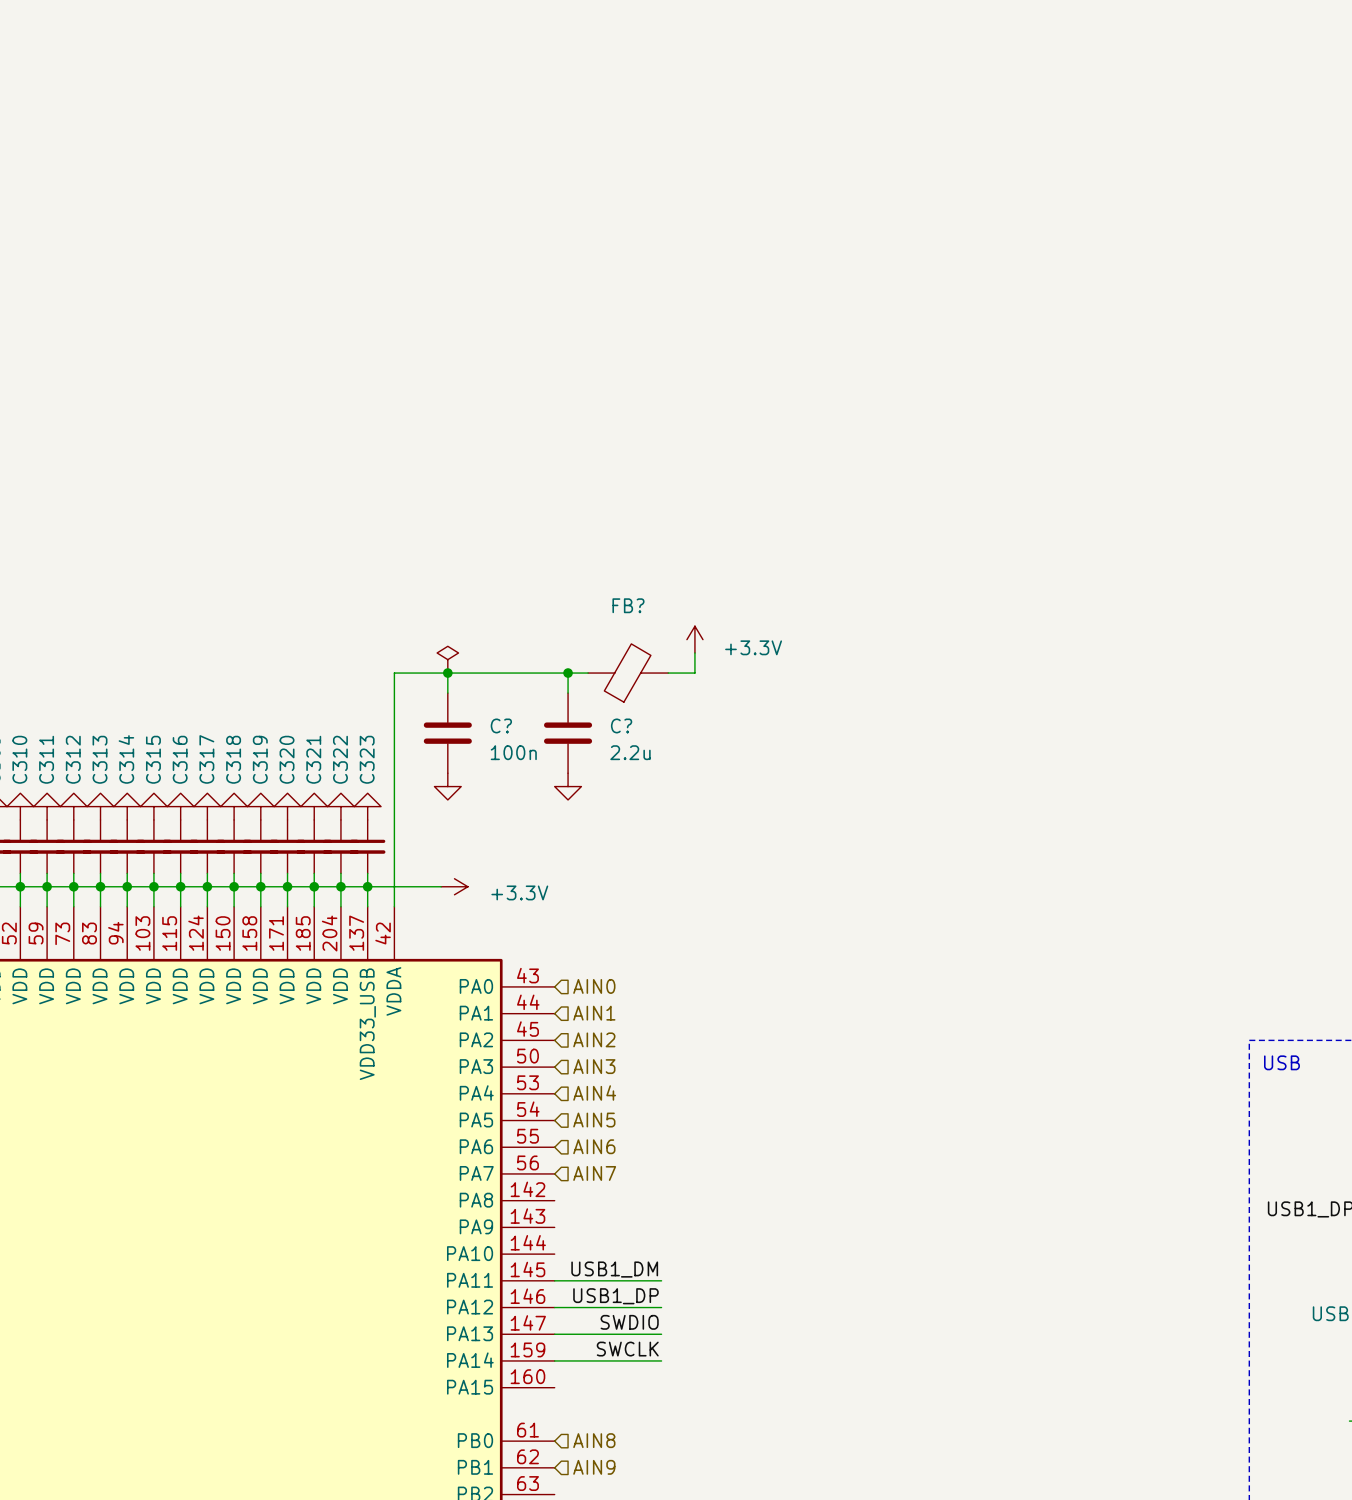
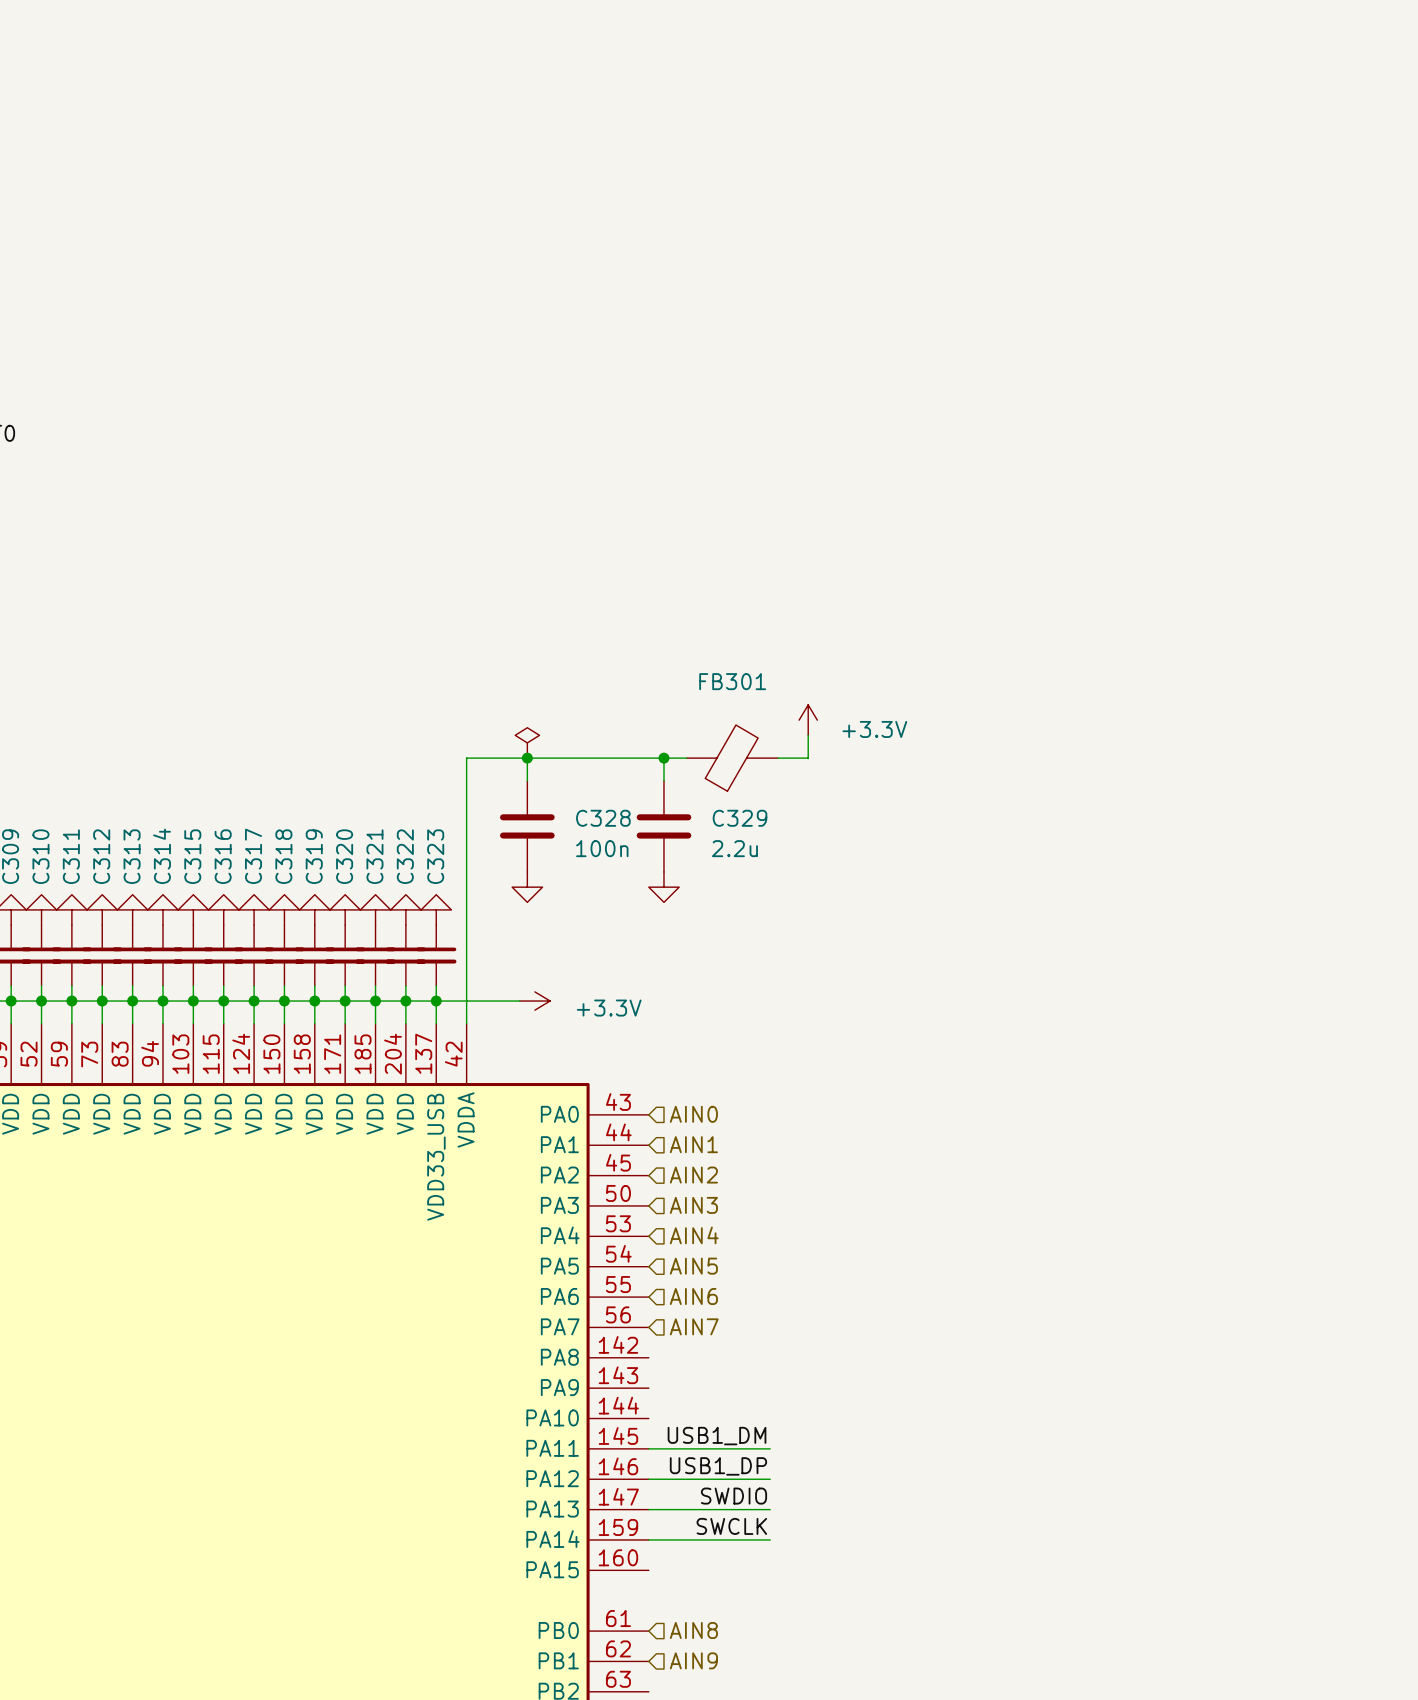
FB? name: FB? (628, 605) -> FB301 (732, 681)
C? name: C? (501, 725) -> C328 (603, 818)
C? name: C? (621, 725) -> C329 (740, 818)

